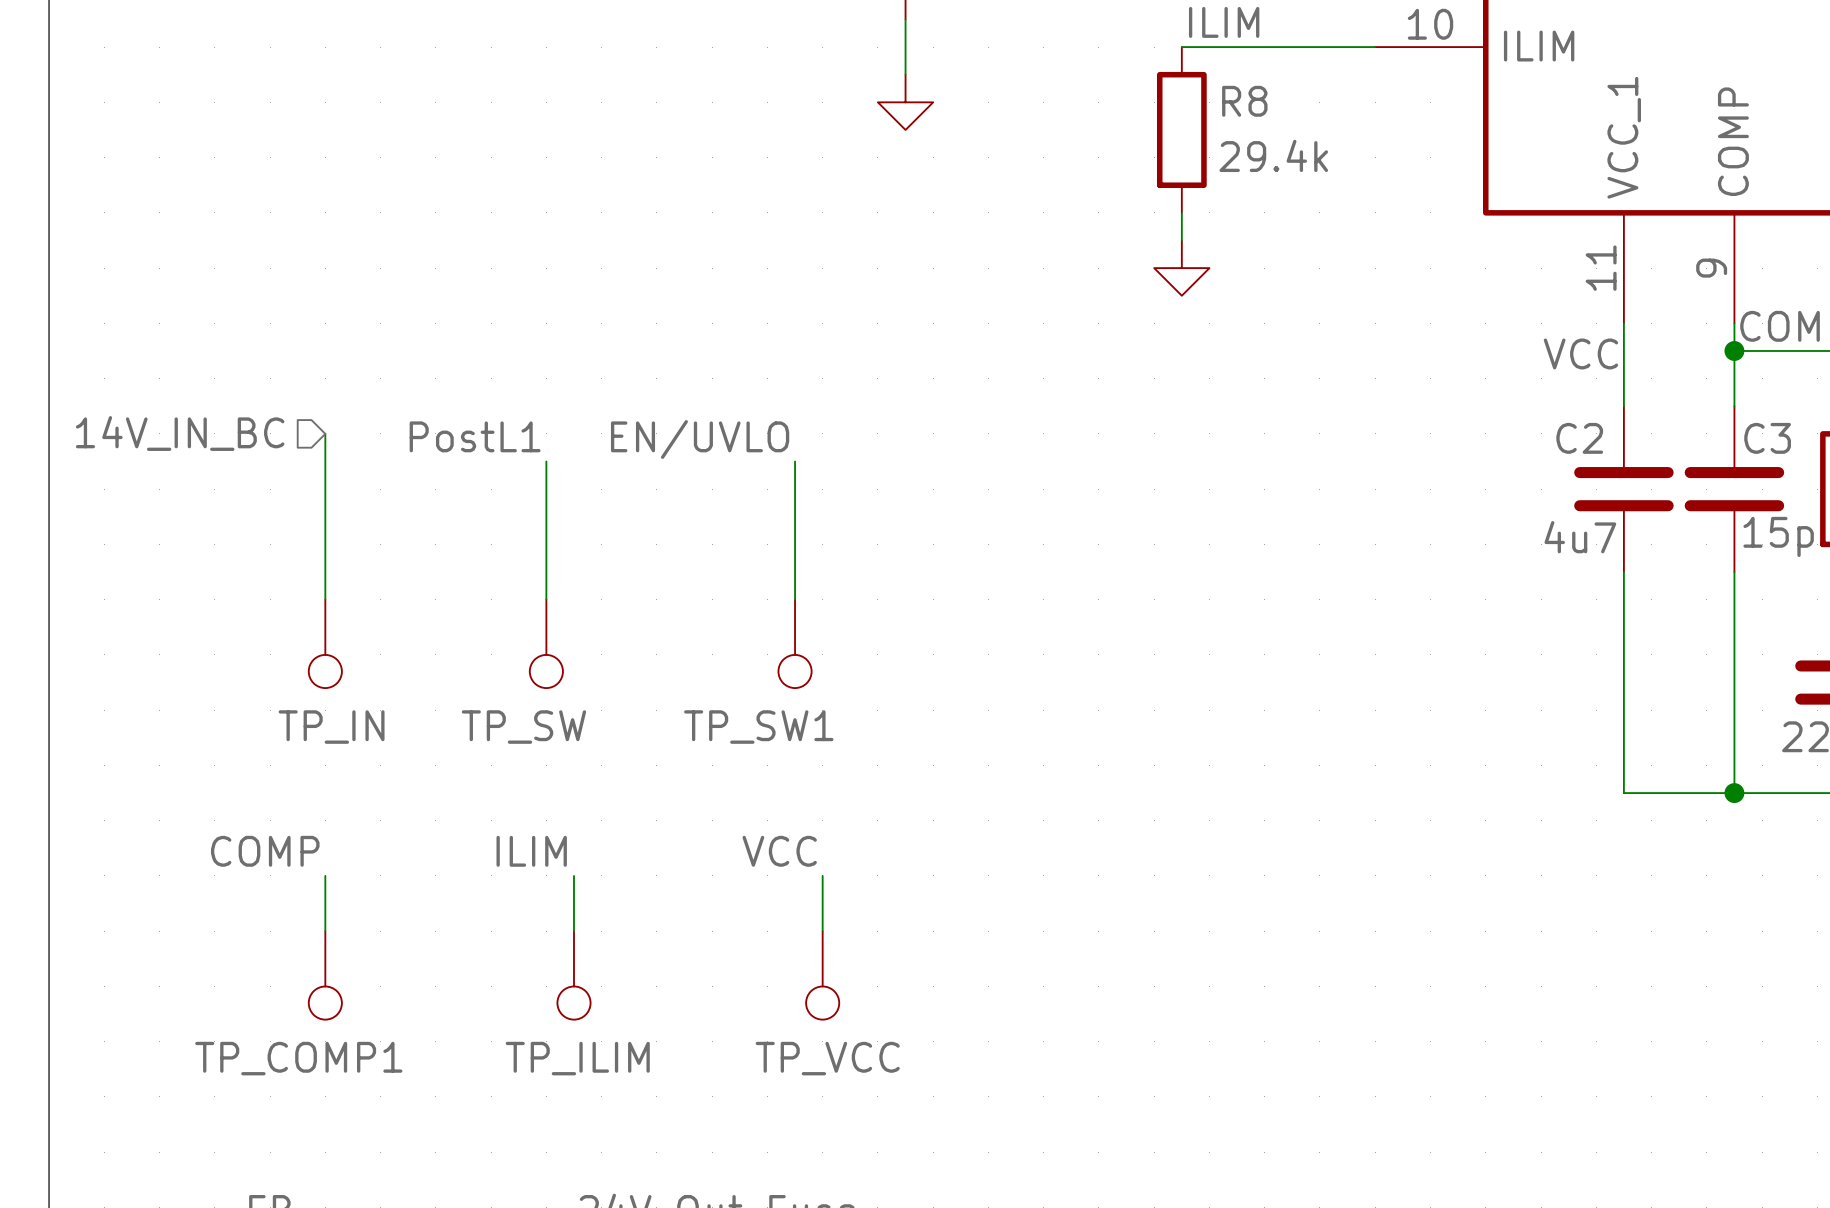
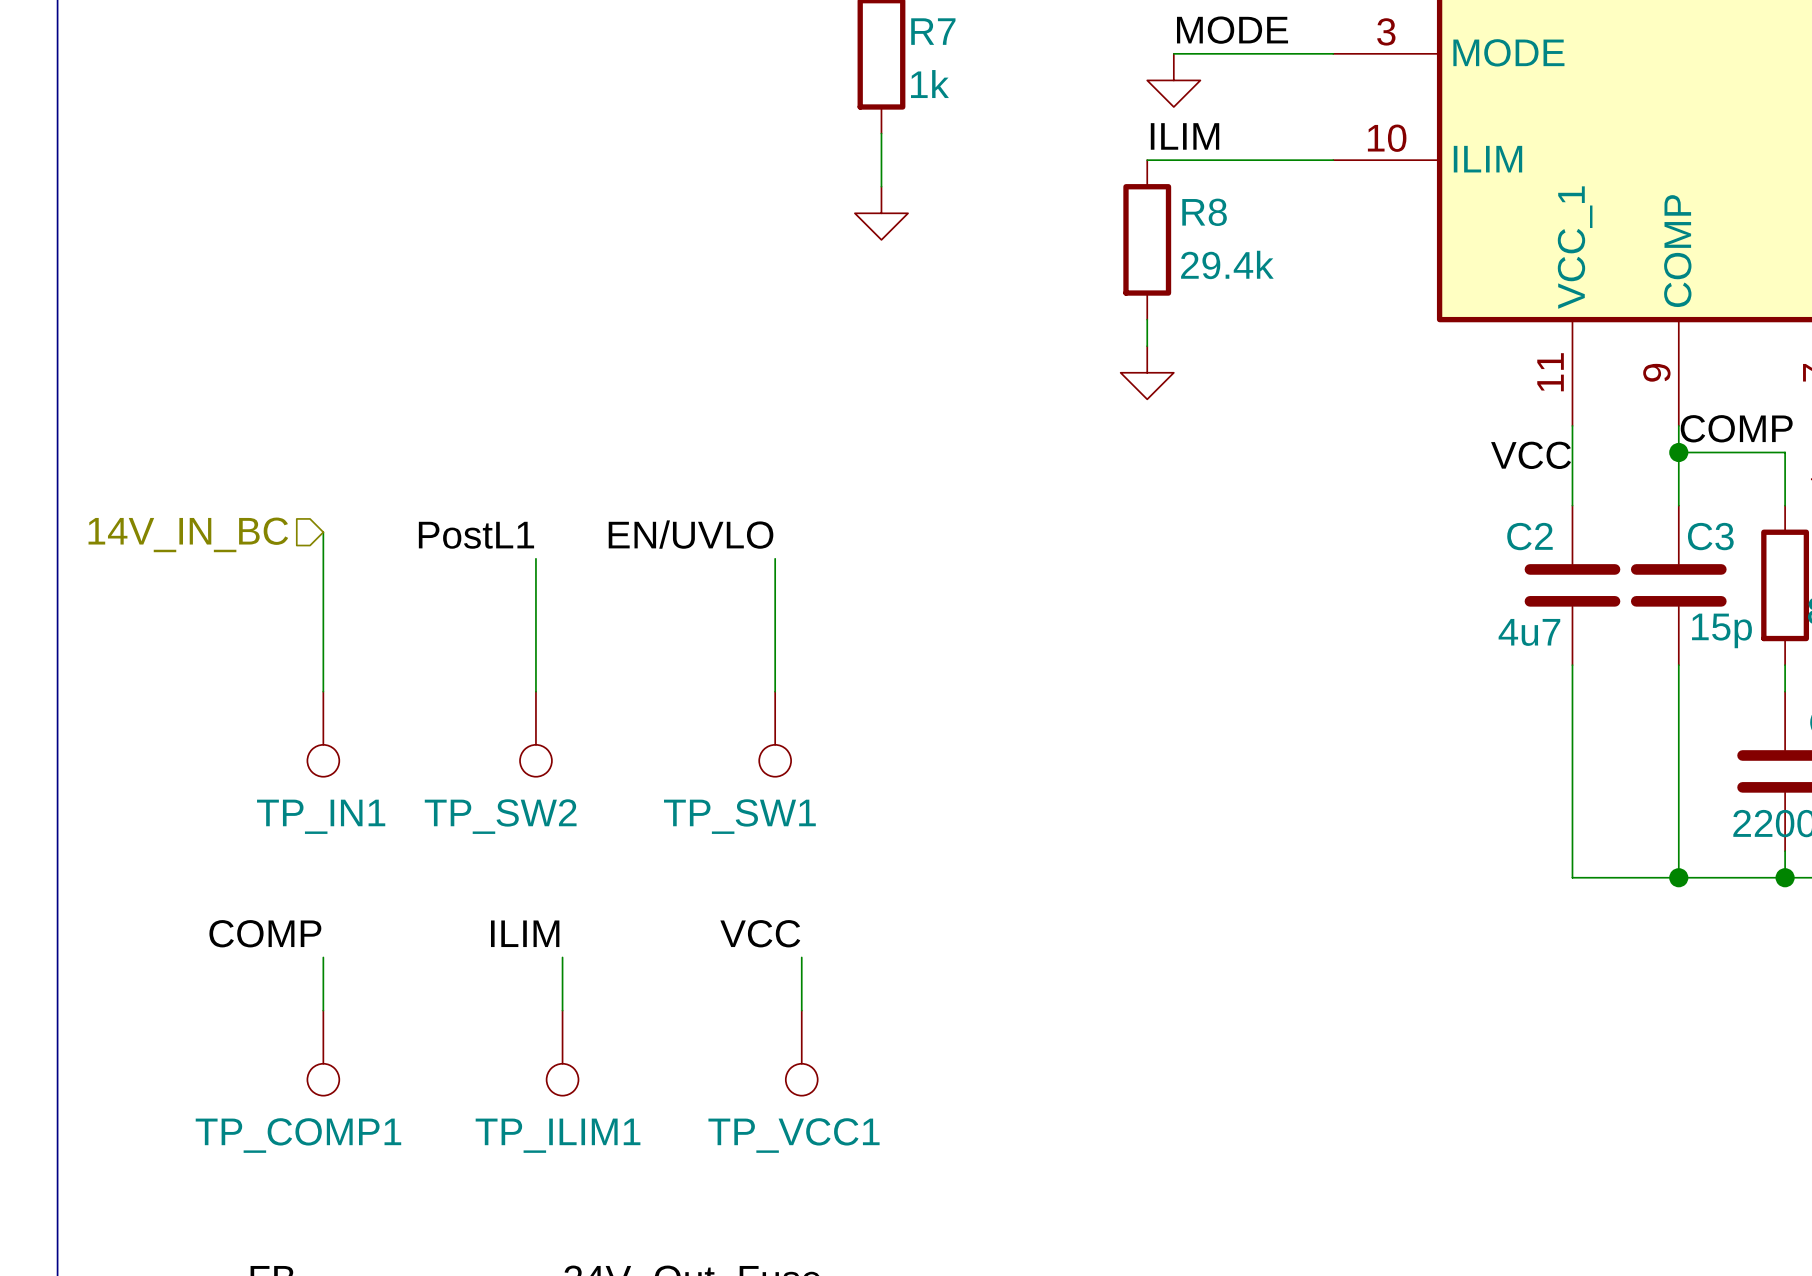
TP_IN name: TP_IN (331, 727) -> TP_IN1 (321, 816)
TP_SW name: TP_SW (523, 727) -> TP_SW2 (500, 816)
TP_ILIM name: TP_ILIM (577, 1058) -> TP_ILIM1 (558, 1135)
TP_VCC name: TP_VCC (827, 1058) -> TP_VCC1 (794, 1135)

